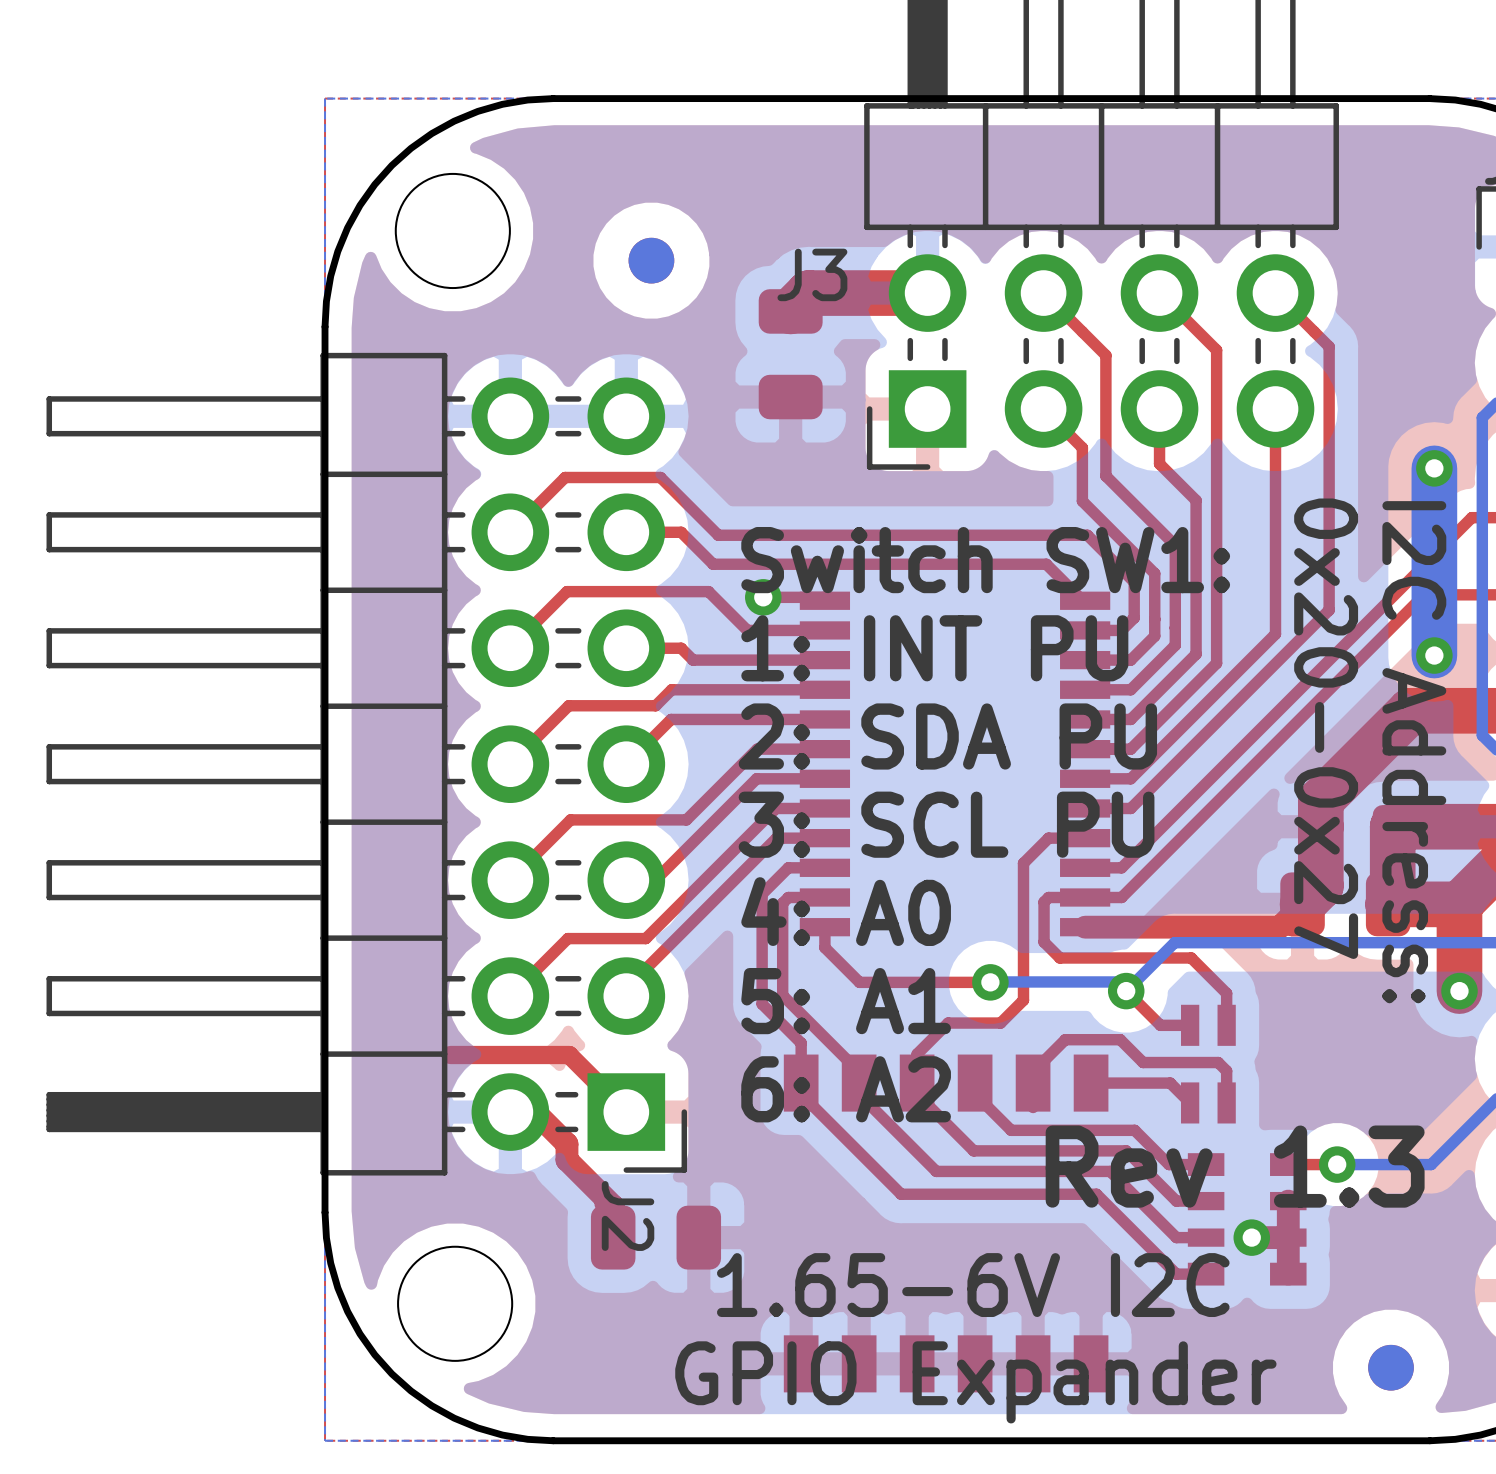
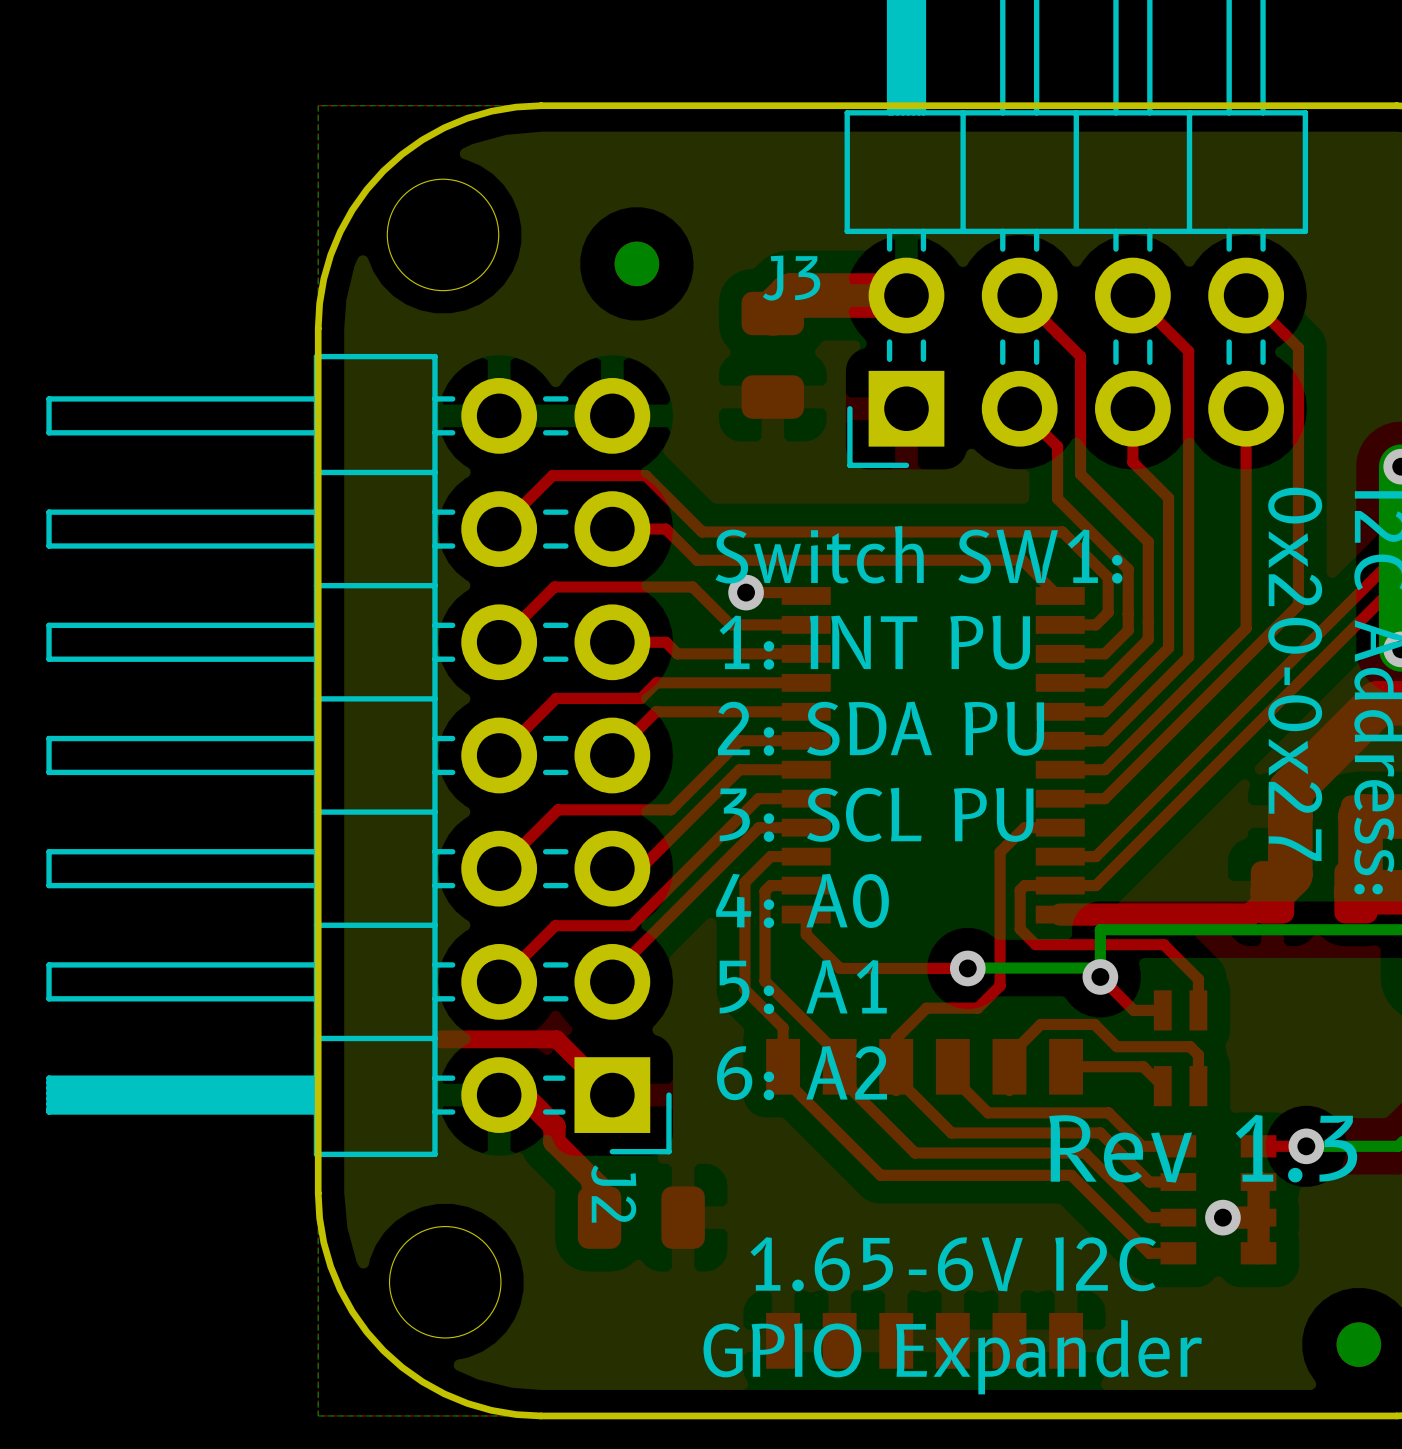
bottom track: (1174, 942) (1126, 991) -> (1147, 929) (1100, 929) (1100, 976)

